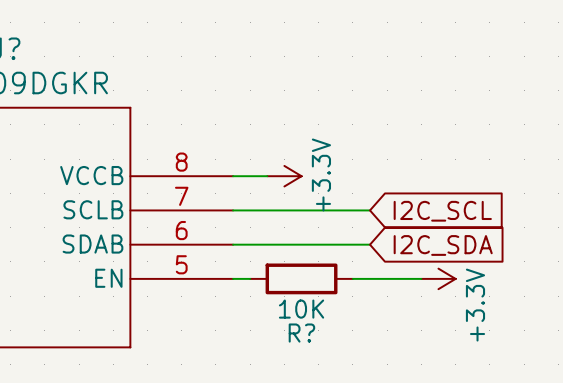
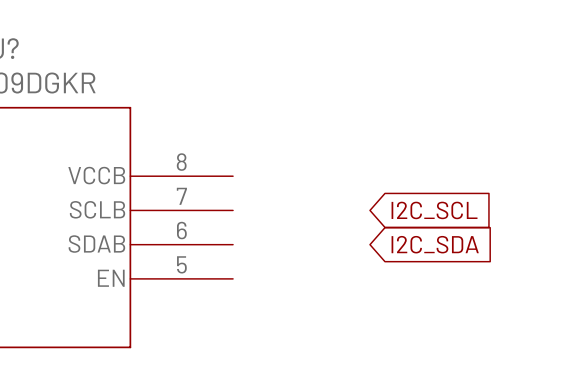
wire: (233, 176) (267, 176) -> none
power symbol: +3.3V (284, 176) -> none
wire: (233, 210) (370, 210) -> none
wire: (233, 244) (370, 244) -> none
wire: (233, 278) (250, 278) -> none
R?: 10K (301, 278) -> none
wire: (352, 278) (421, 278) -> none
power symbol: +3.3V (438, 278) -> none

